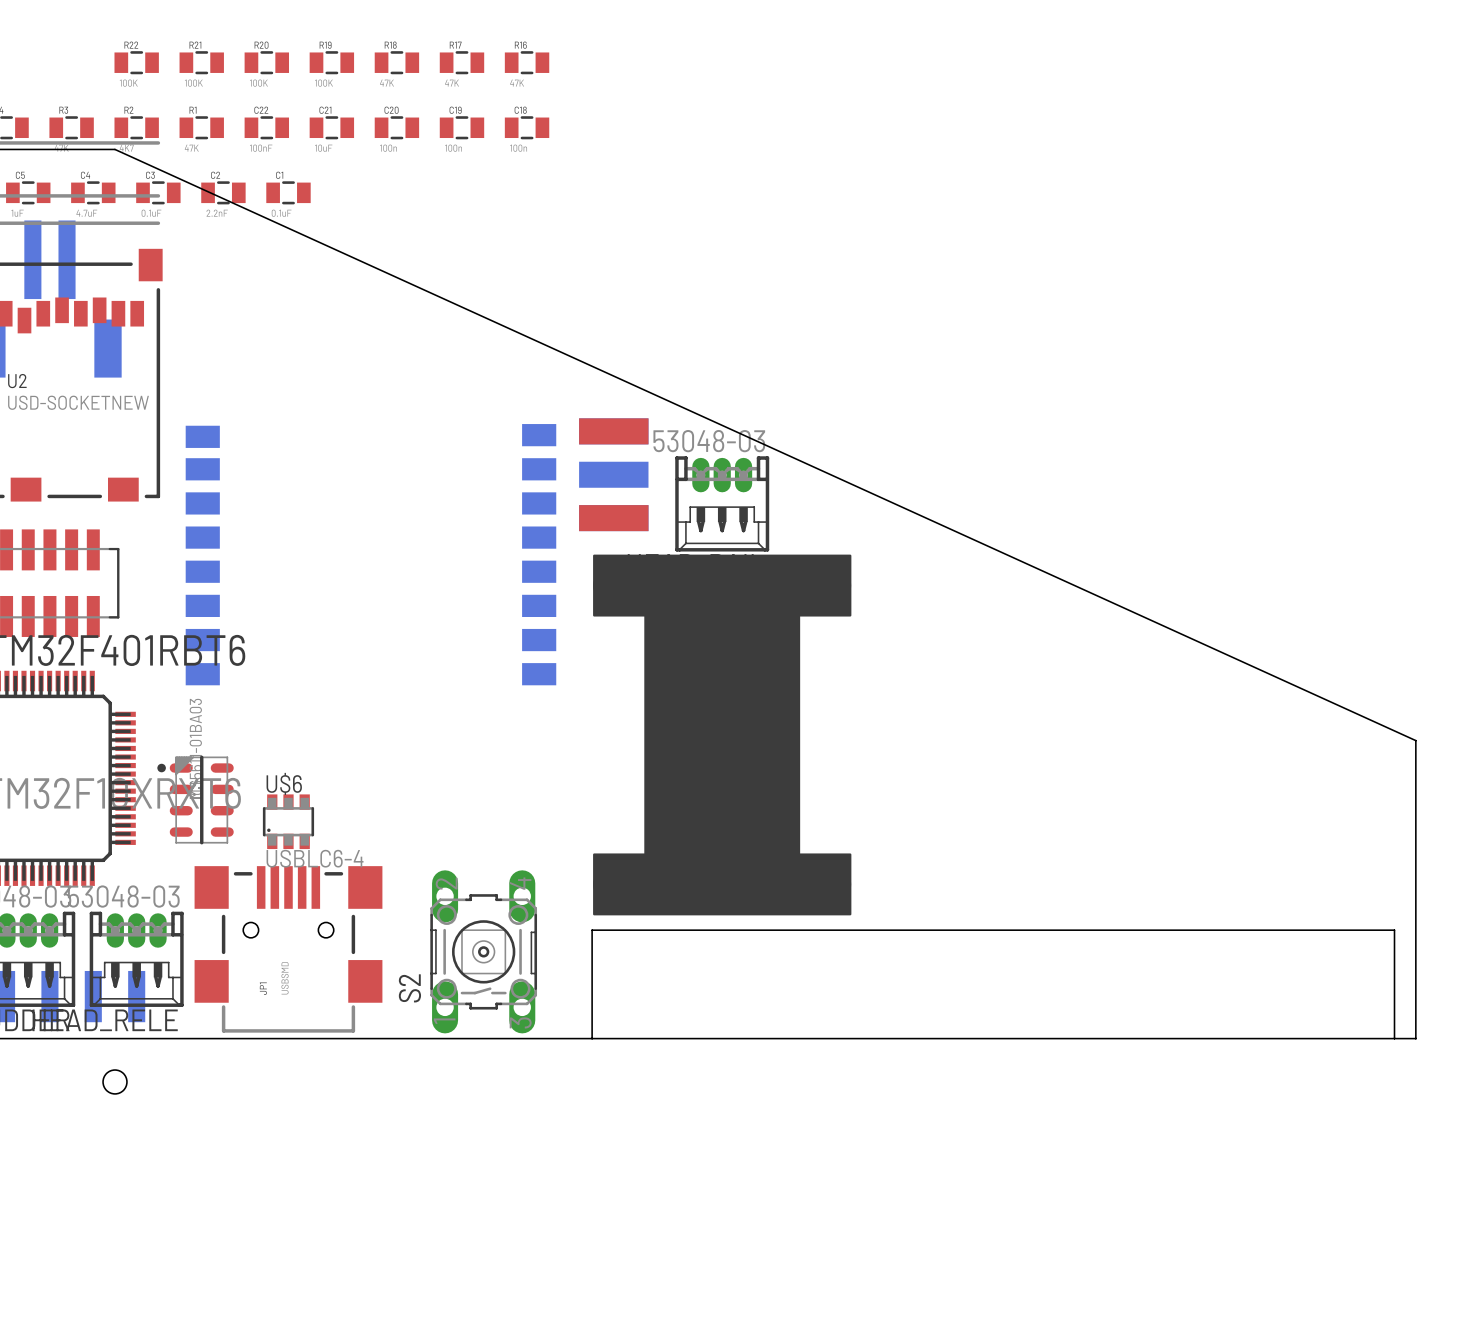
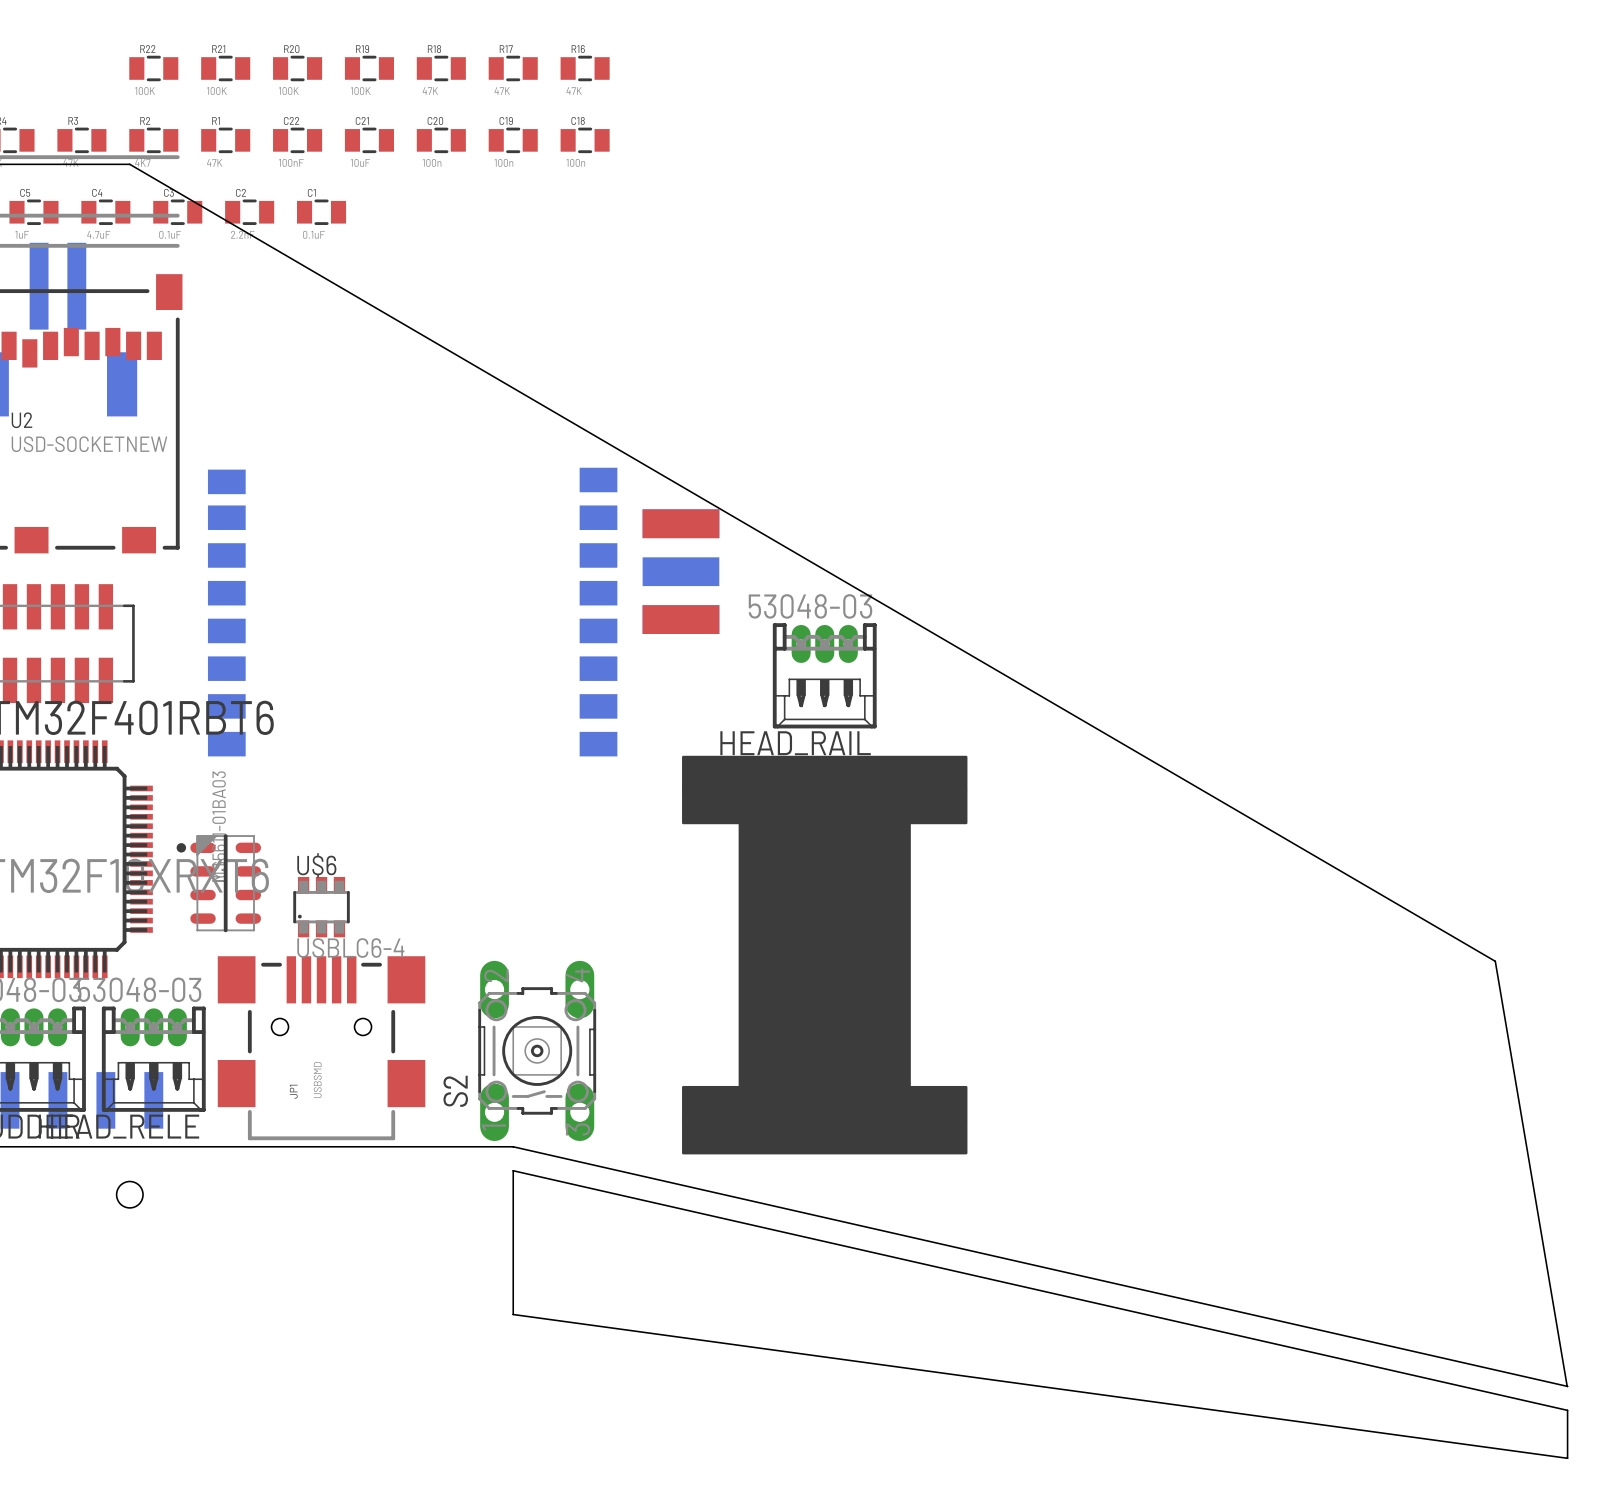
board edge: (115, 149) (1415, 740) (1415, 1038) -> (129, 164) (1495, 961) (1567, 1386)
part position: (613, 474) -> (680, 571)
HEAD_RAIL position: (722, 503) -> (824, 675)
part position: (722, 734) -> (824, 955)
board edge: (461, 1038) (1416, 1038) -> (513, 1146) (1567, 1386)
board edge: (592, 1038) (592, 930) (1394, 930) (1394, 1038) -> none
board edge: none -> (513, 1170) (1567, 1410) (1567, 1458) (513, 1314) (513, 1170)

